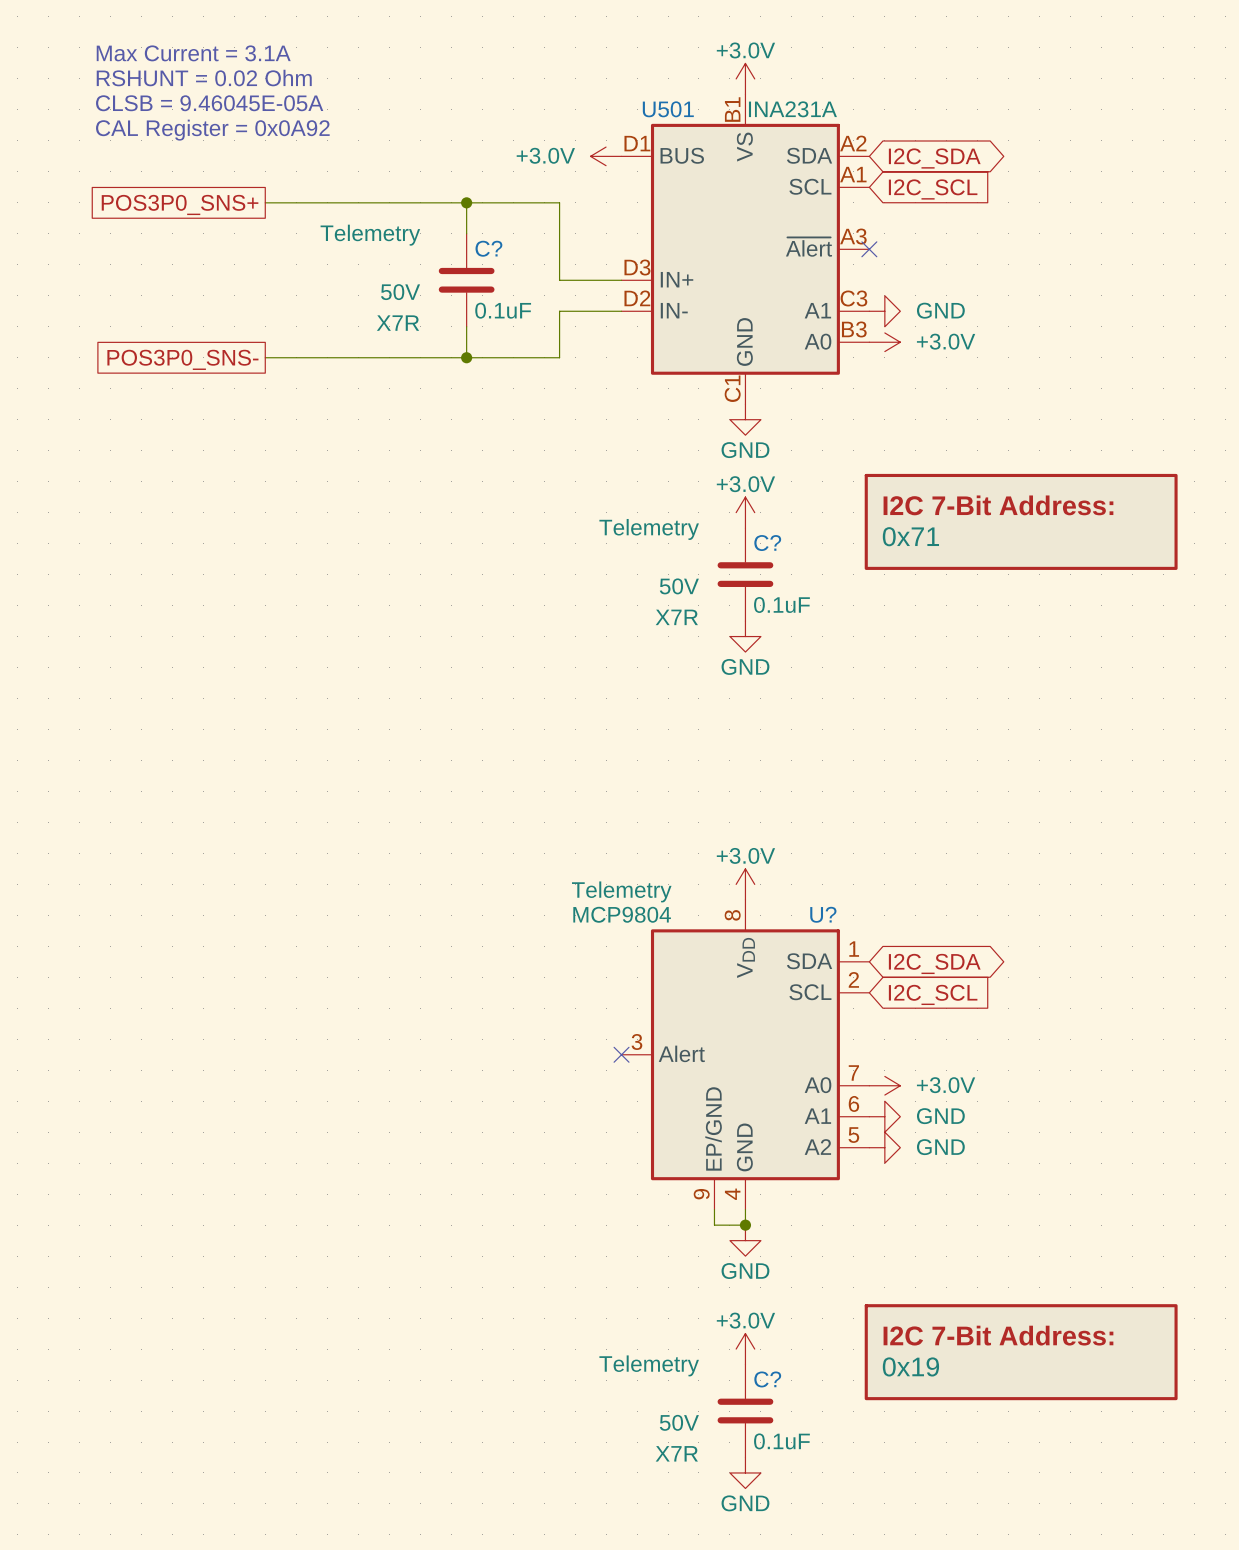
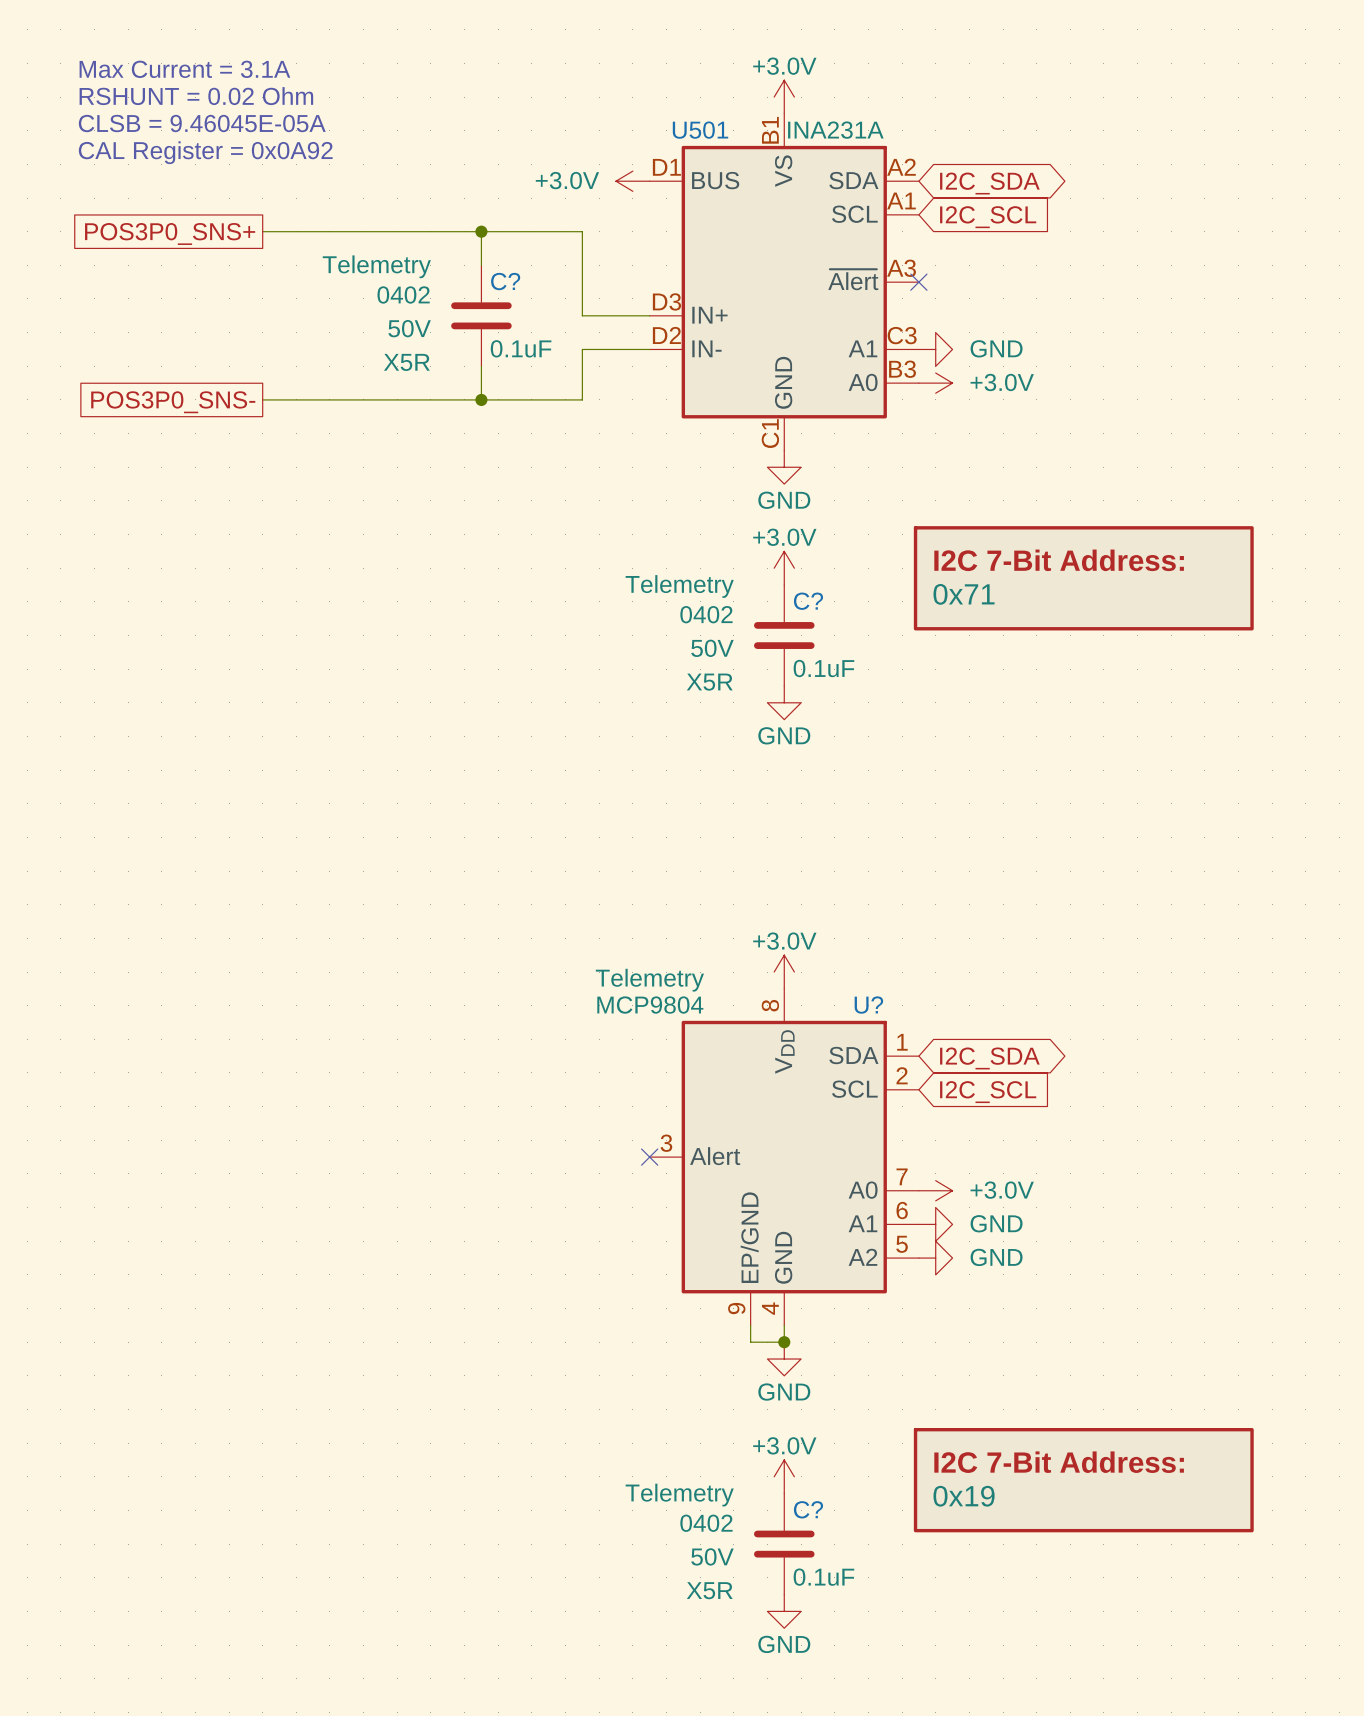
C? text: none -> 0402 (403, 294)
C? text: X7R (398, 323) -> X5R (406, 362)
C? text: none -> 0402 (706, 614)
C? text: X7R (676, 617) -> X5R (709, 682)
C? text: none -> 0402 (706, 1523)
C? text: X7R (676, 1453) -> X5R (709, 1590)

